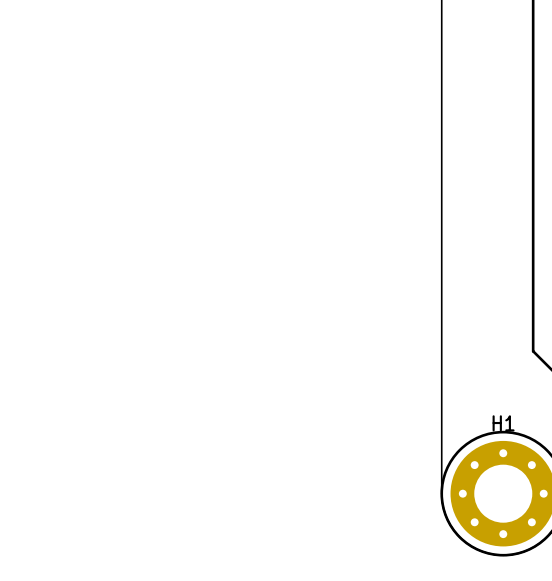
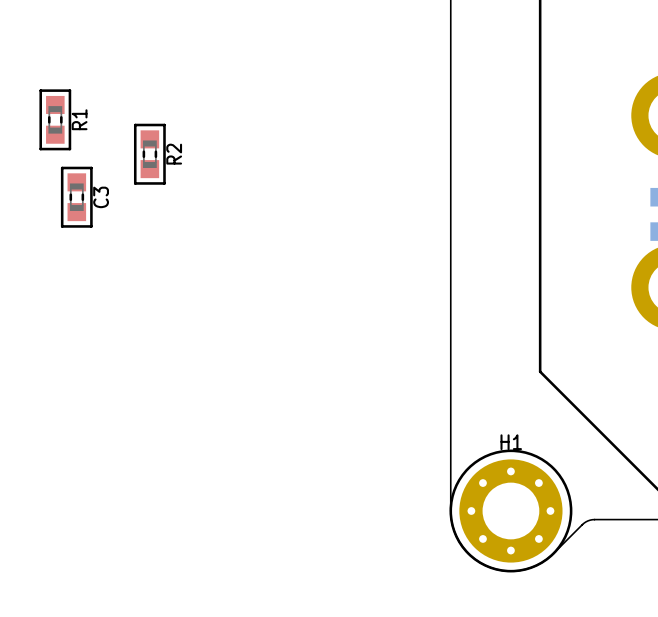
R1: none -> (55, 119)
R2: none -> (149, 154)
C3: none -> (76, 197)

